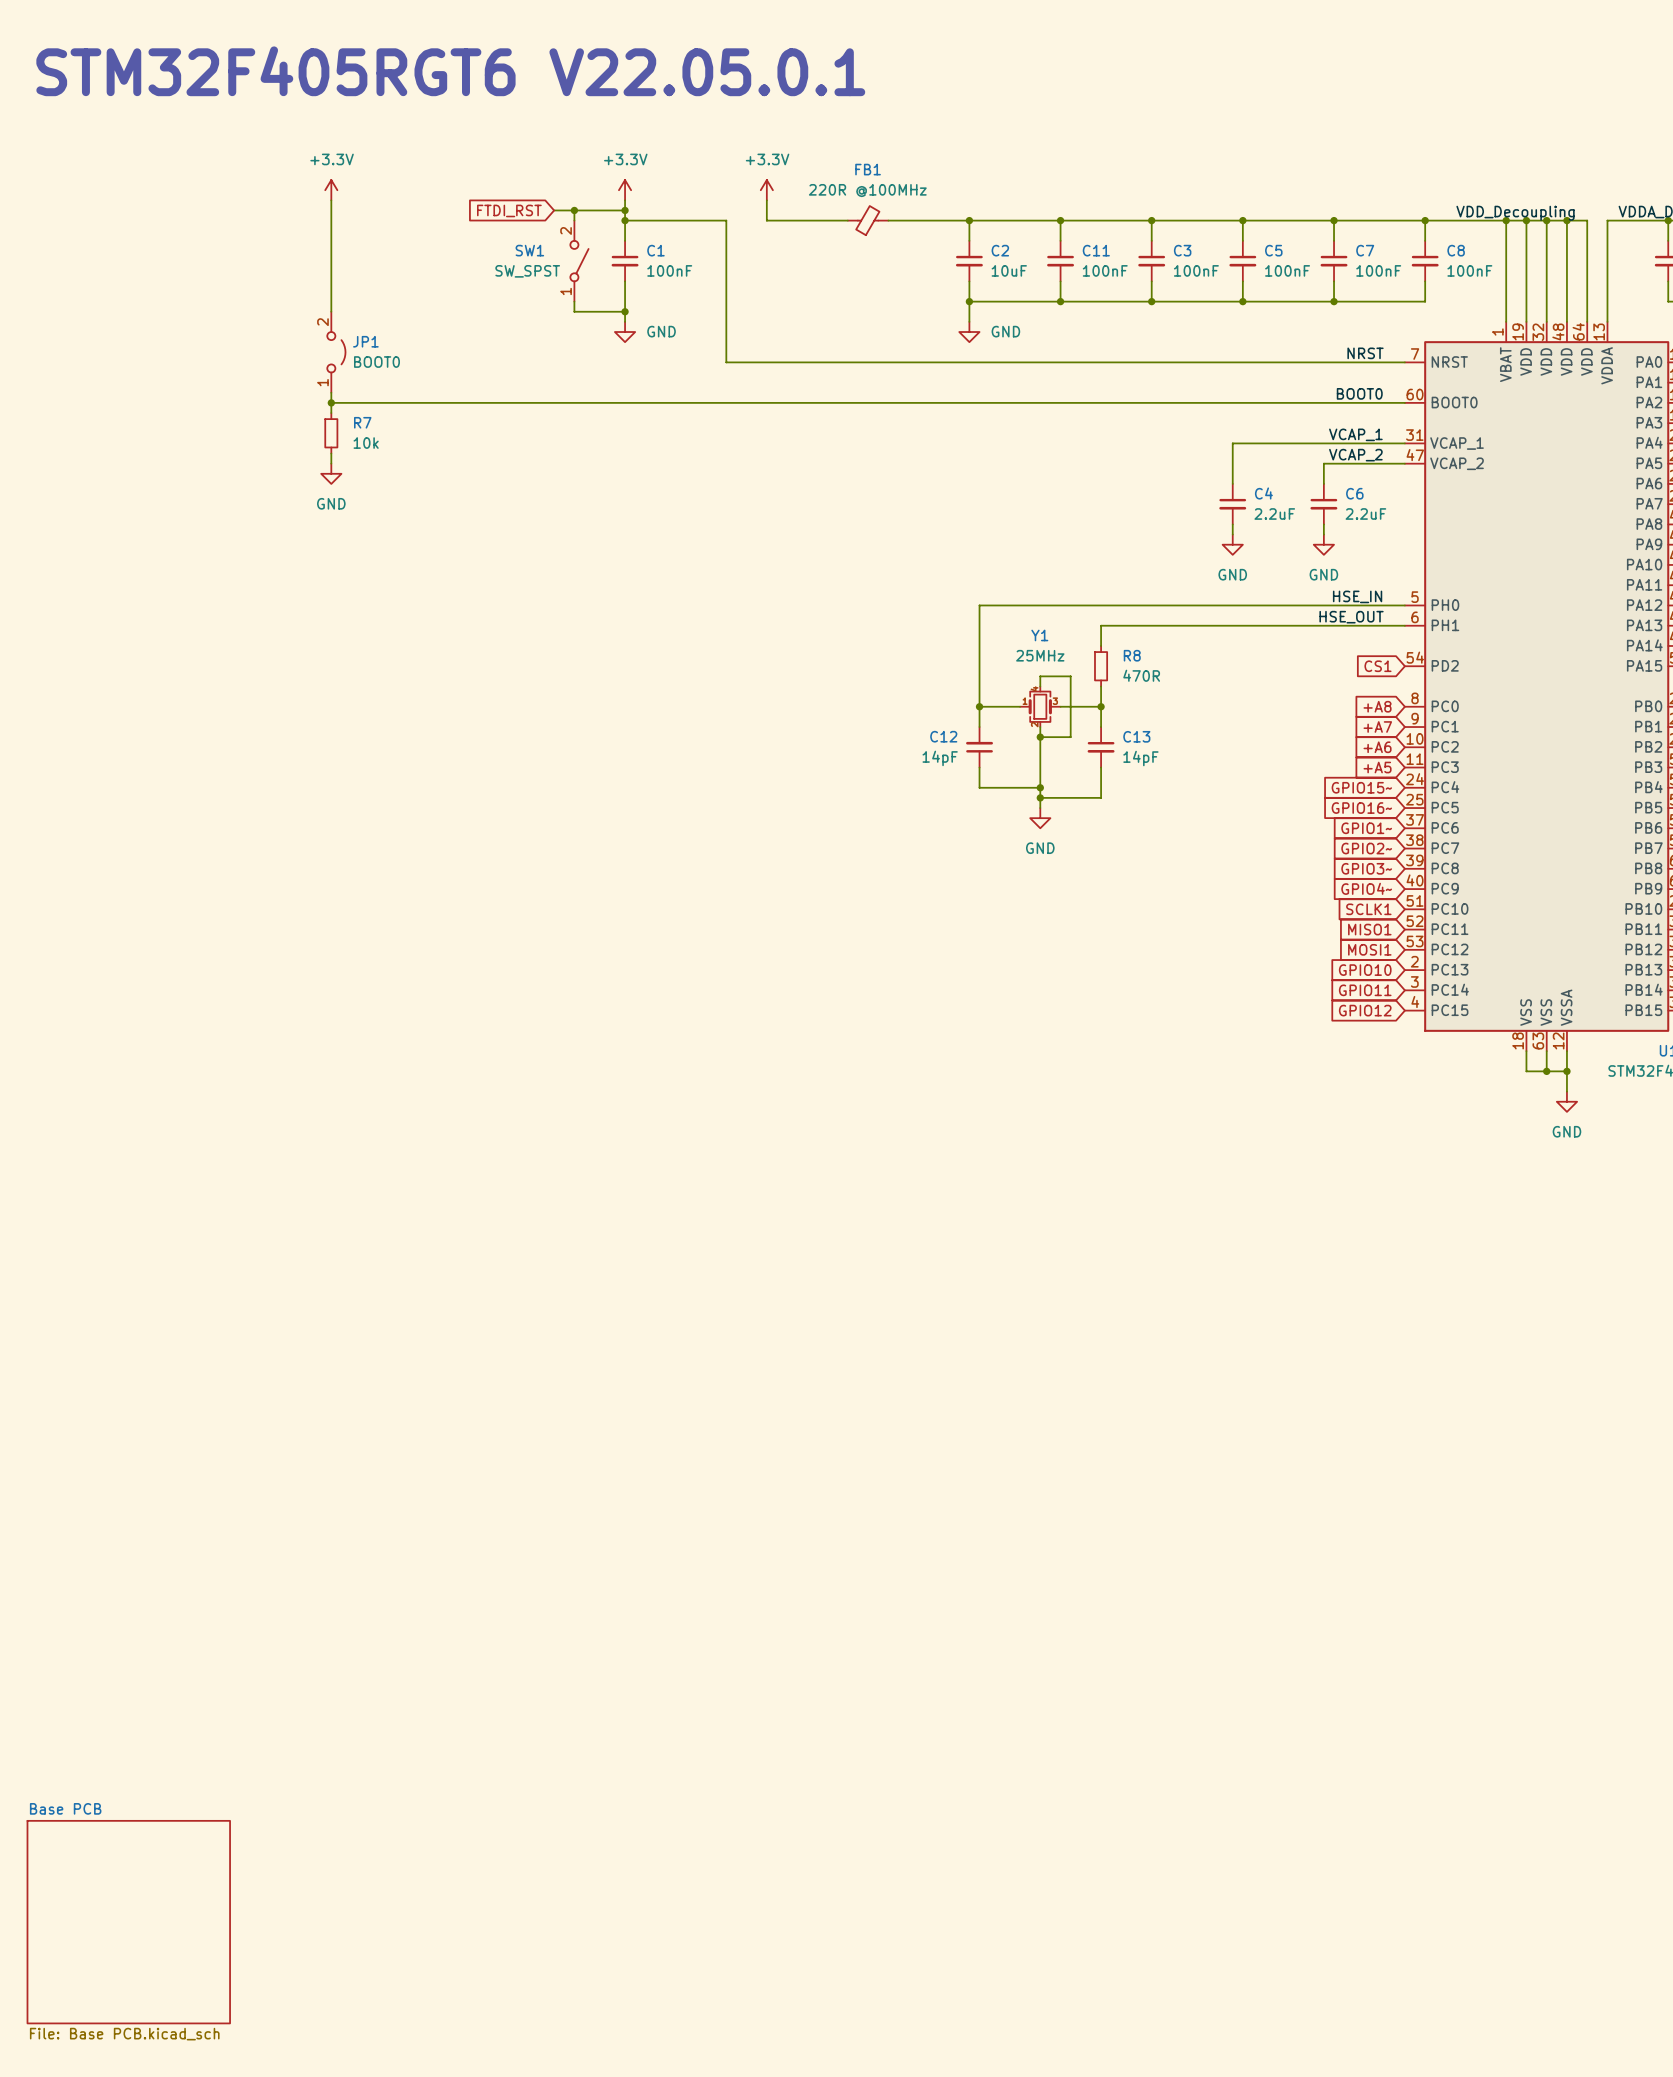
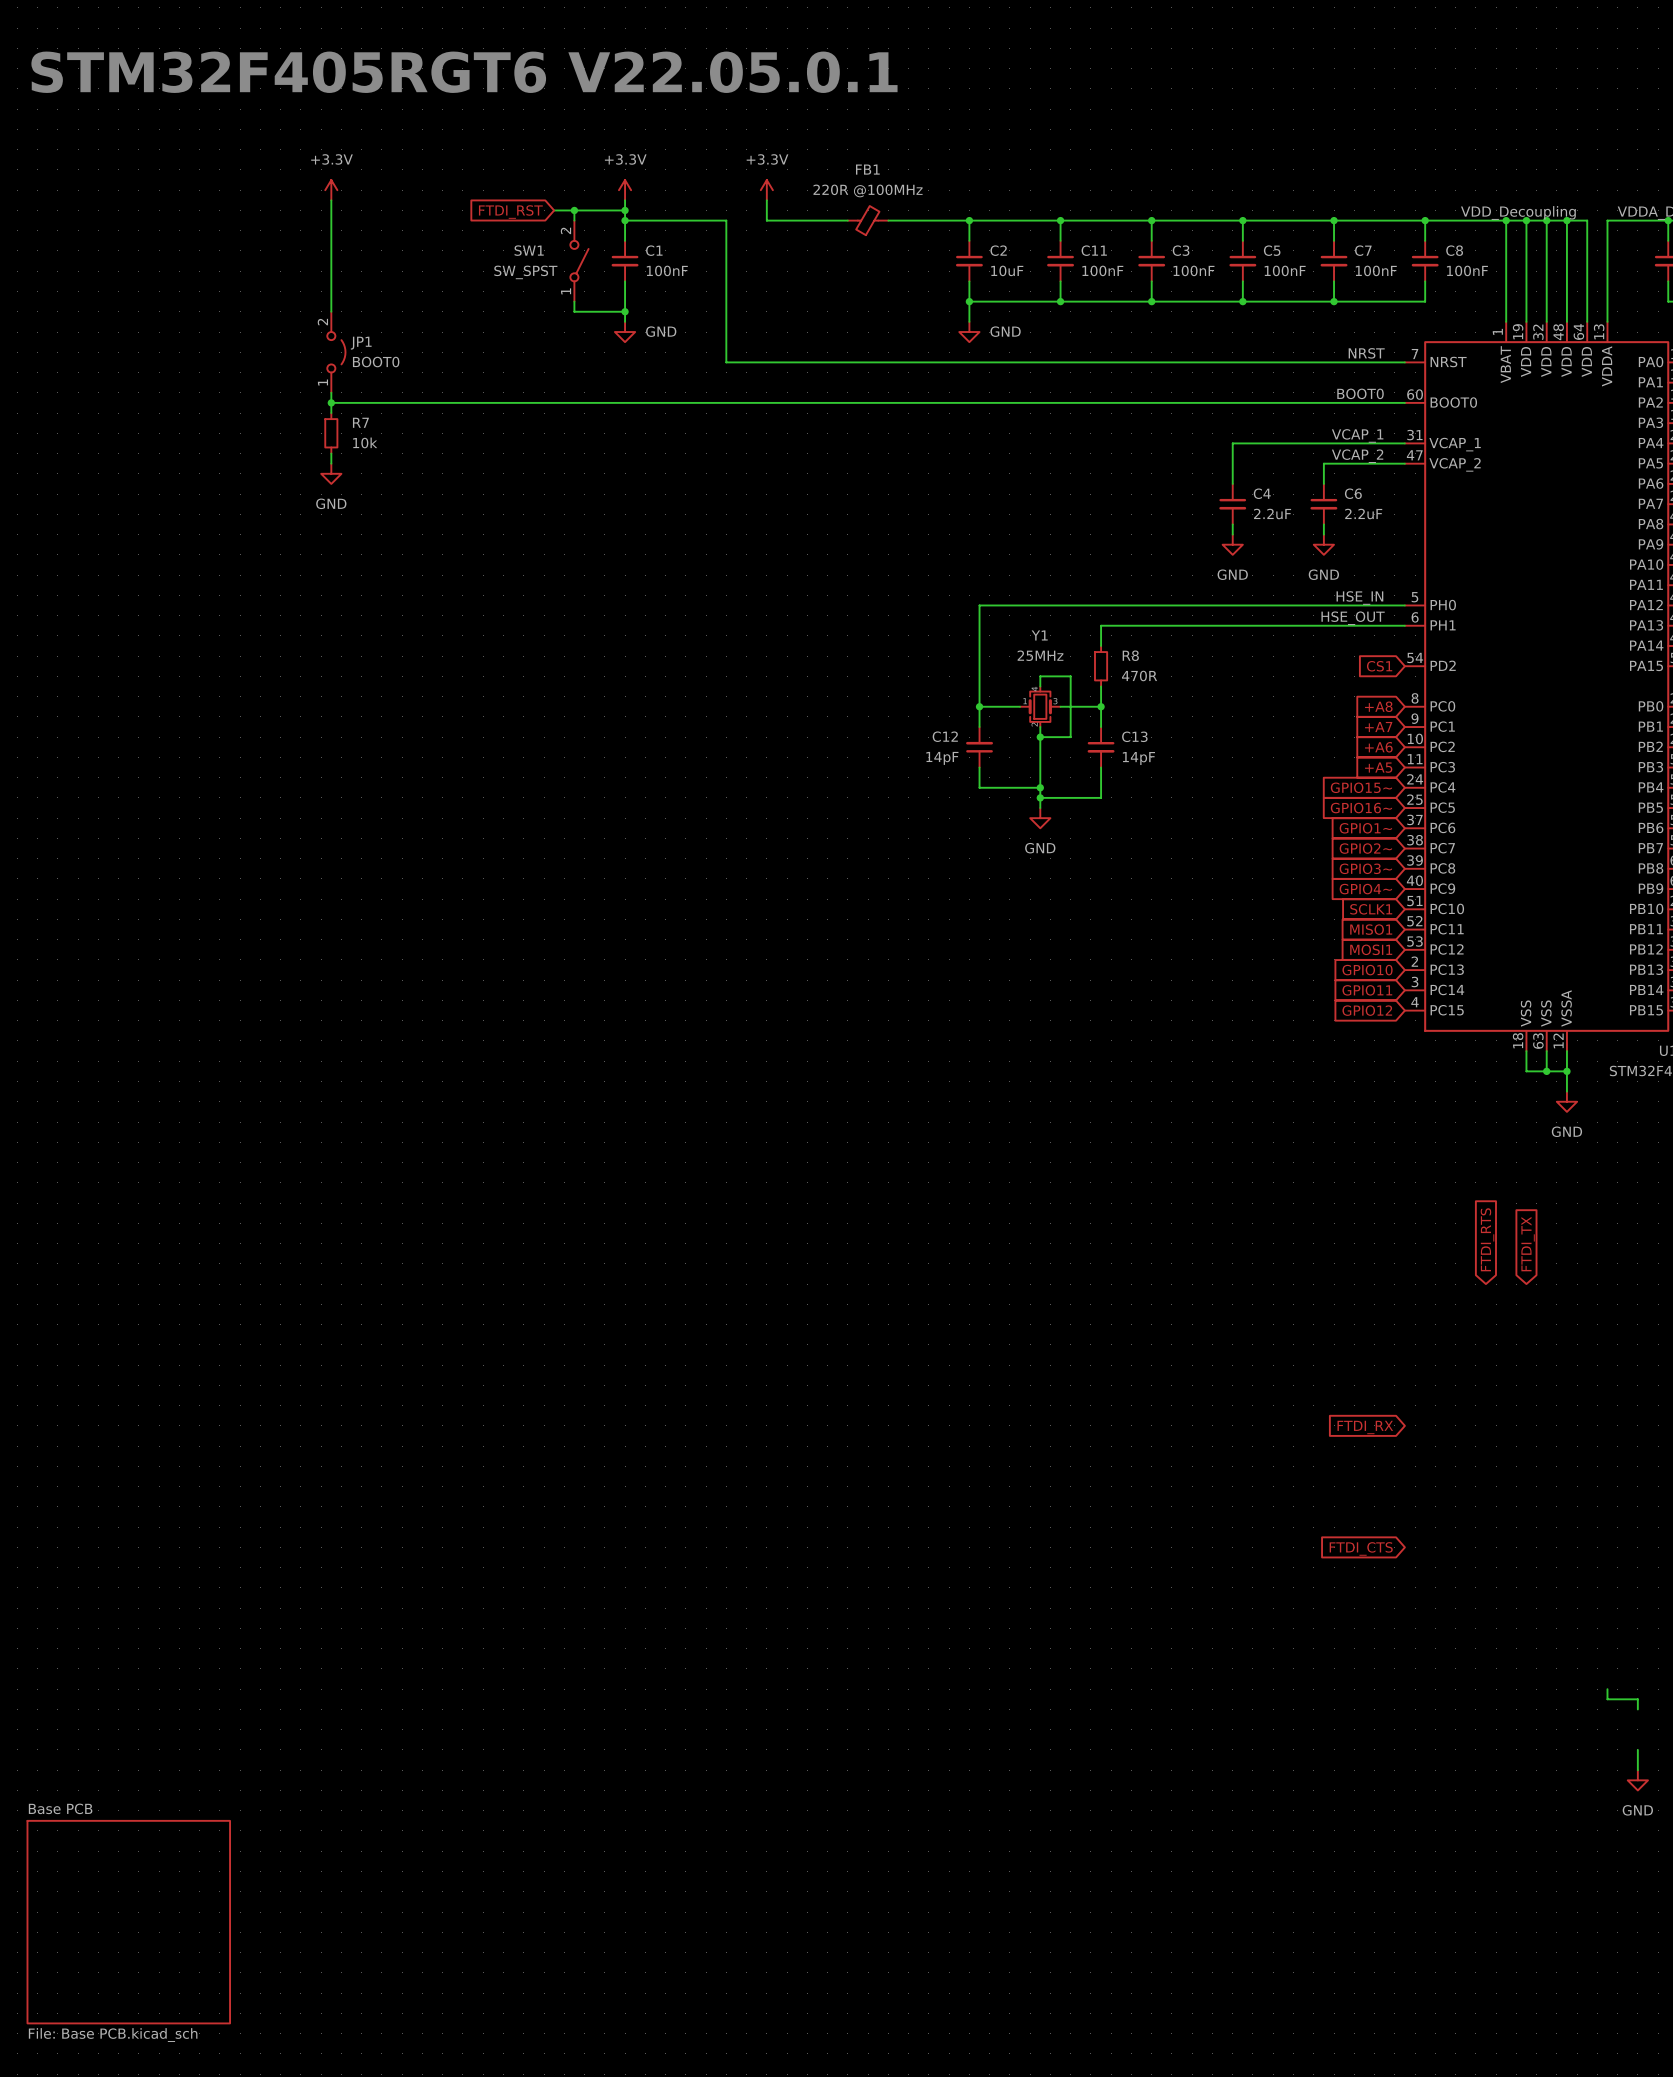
global label: none -> FTDI_RTS (1487, 1239)
global label: none -> FTDI_TX (1528, 1244)
global label: none -> FTDI_RX (1365, 1427)
global label: none -> FTDI_CTS (1361, 1548)
wire: none -> (1607, 1689) (1607, 1699) (1637, 1699) (1637, 1709)
wire: none -> (1637, 1749) (1637, 1770)
power symbol: none -> GND (1637, 1780)

